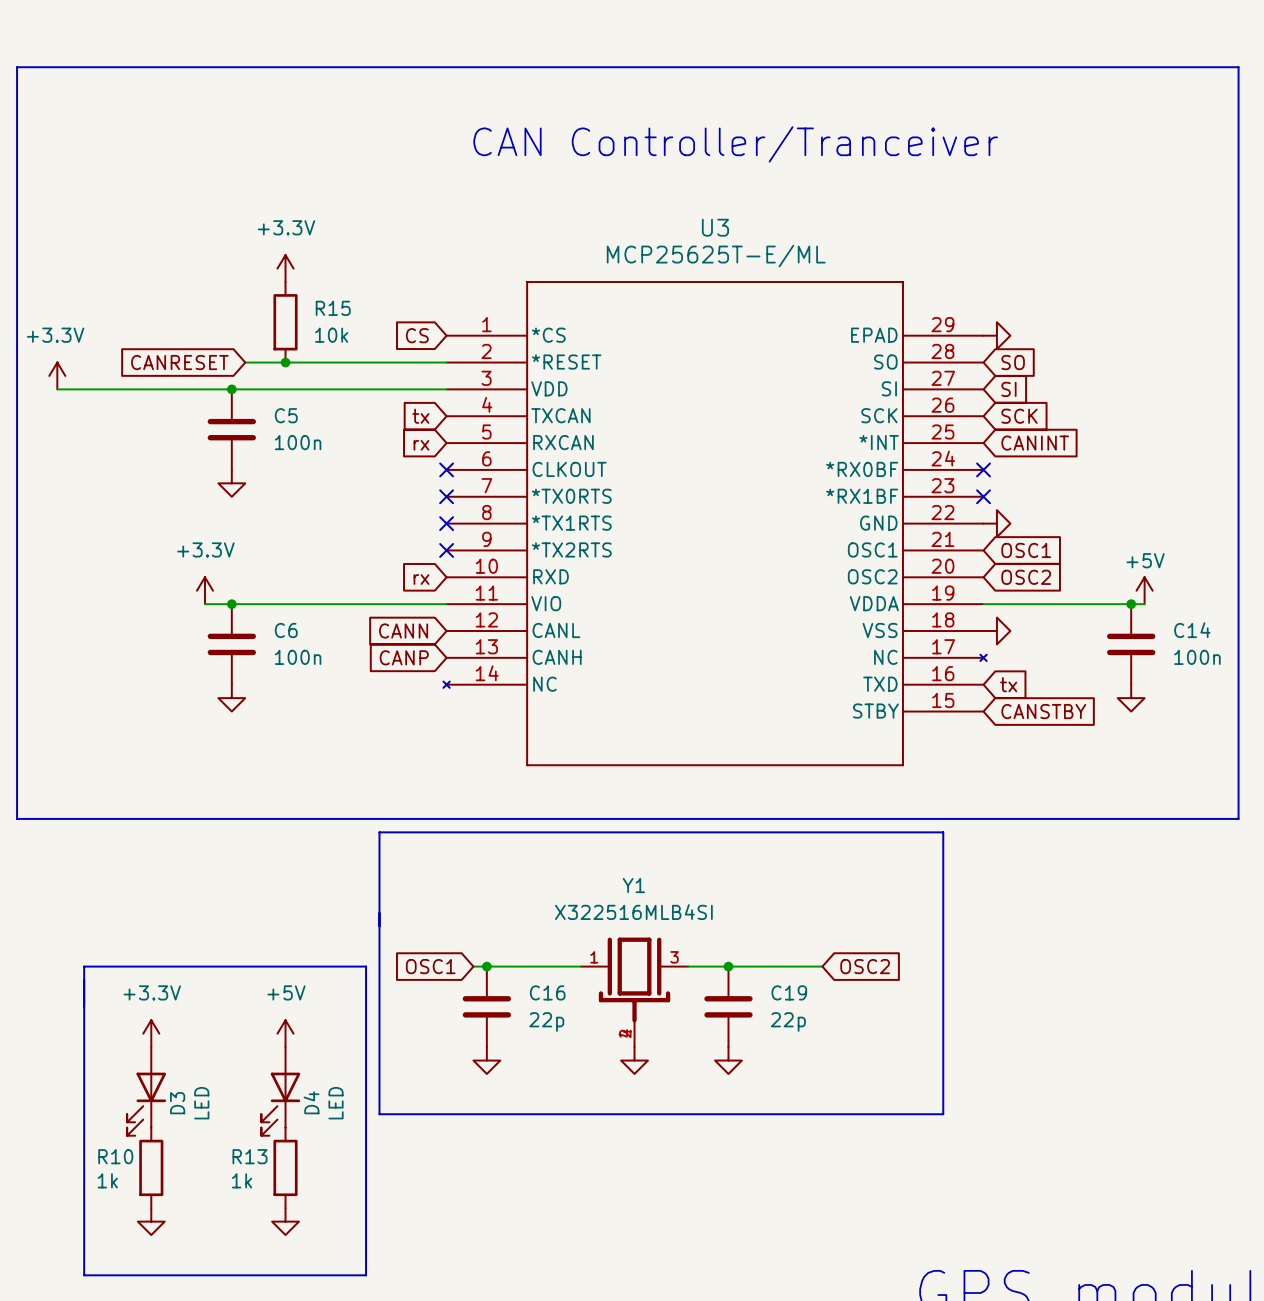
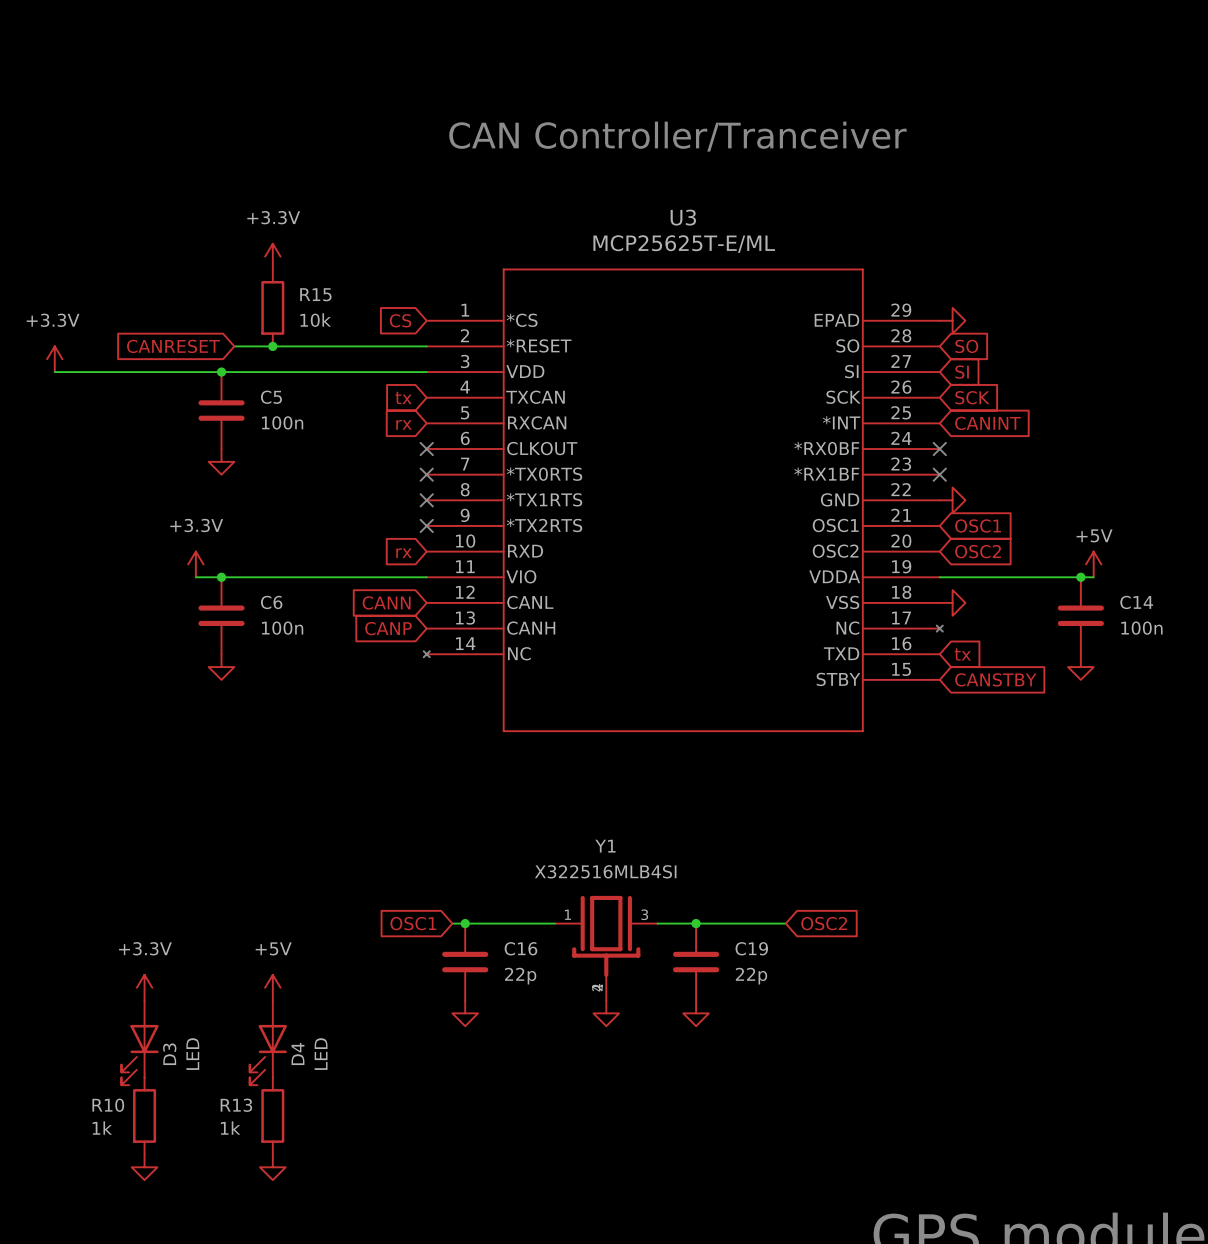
line: (17, 67) (1238, 67) (1238, 818) (17, 818) (17, 67) -> none
line: (379, 832) (379, 1114) (943, 1114) (943, 832) (379, 832) -> none
line: (84, 966) (84, 1275) (366, 1275) (366, 966) (84, 966) -> none

